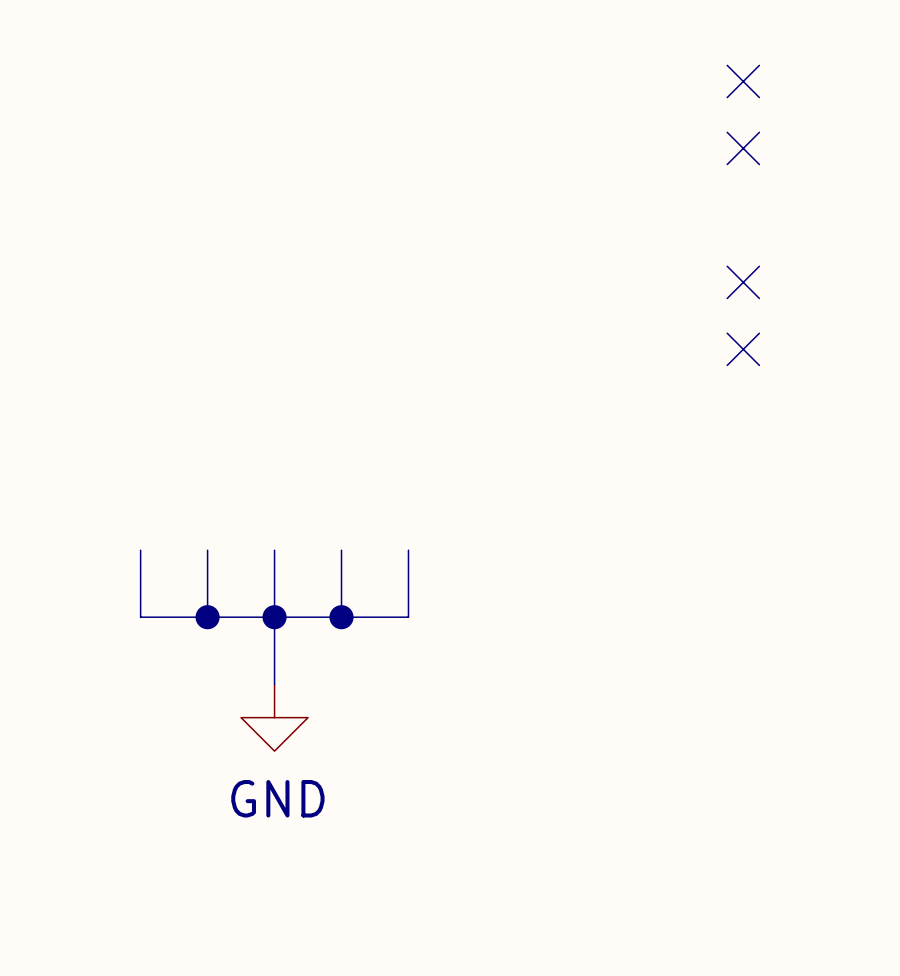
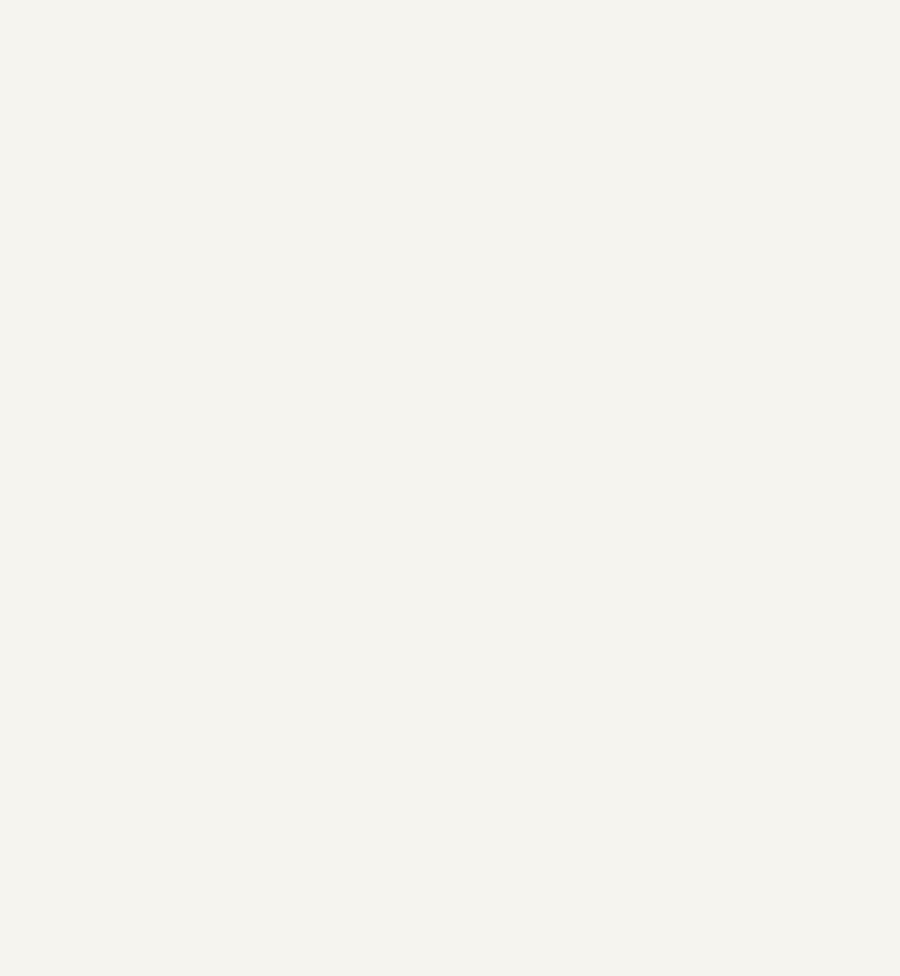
no-connect mark: (743, 81) -> none
no-connect mark: (743, 148) -> none
no-connect mark: (743, 282) -> none
no-connect mark: (743, 349) -> none
wire: (140, 550) (140, 617) (408, 617) (408, 550) -> none
wire: (207, 550) (207, 617) -> none
wire: (274, 550) (274, 684) -> none
wire: (341, 550) (341, 617) -> none
junction: (207, 617) -> none
junction: (274, 617) -> none
junction: (341, 617) -> none
power symbol: GND (274, 717) -> none

